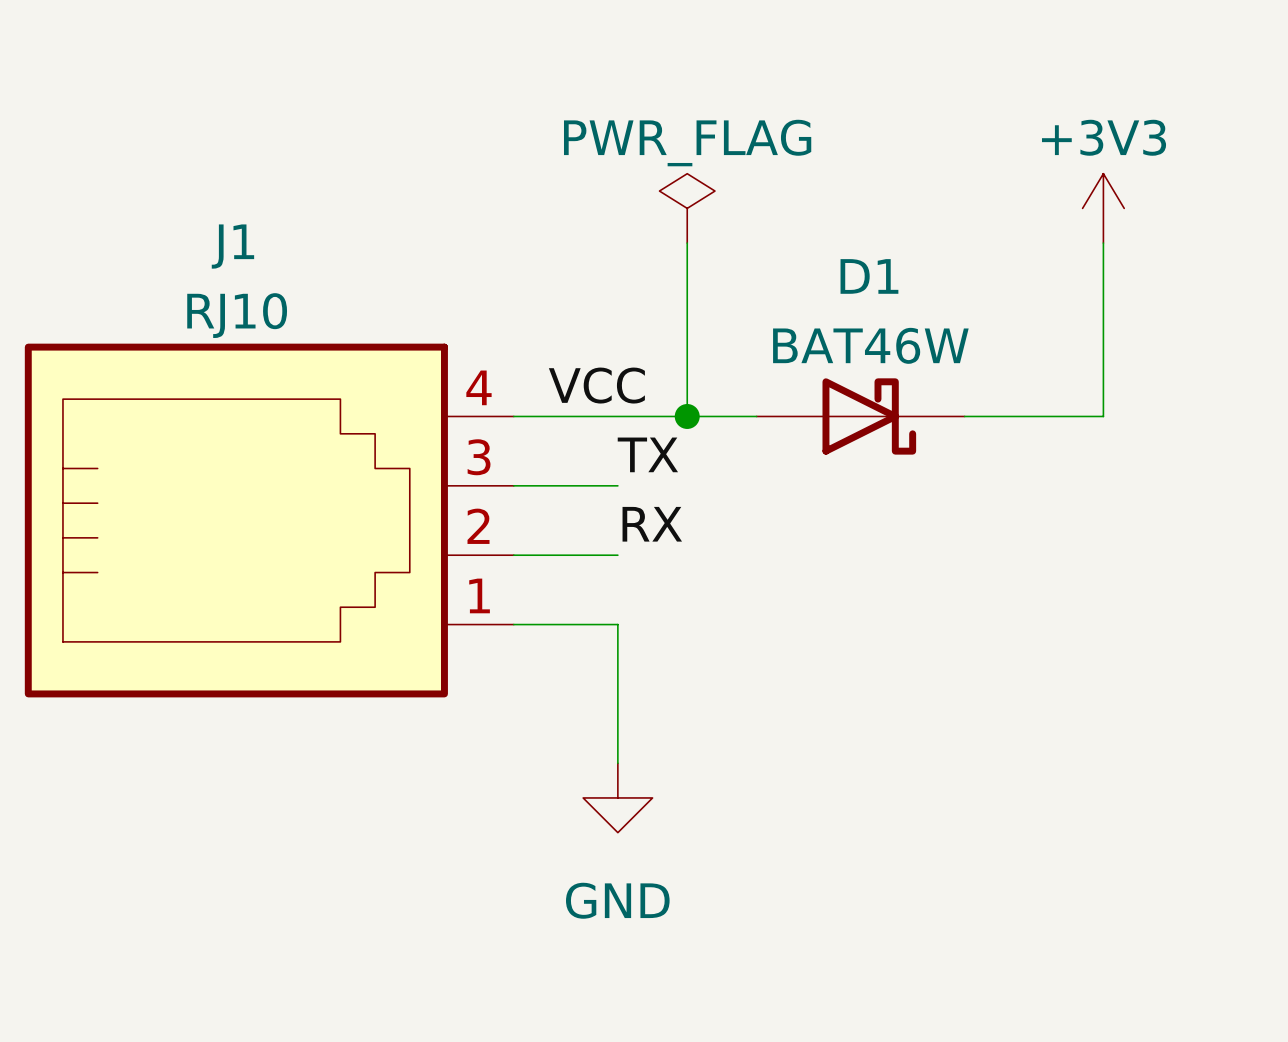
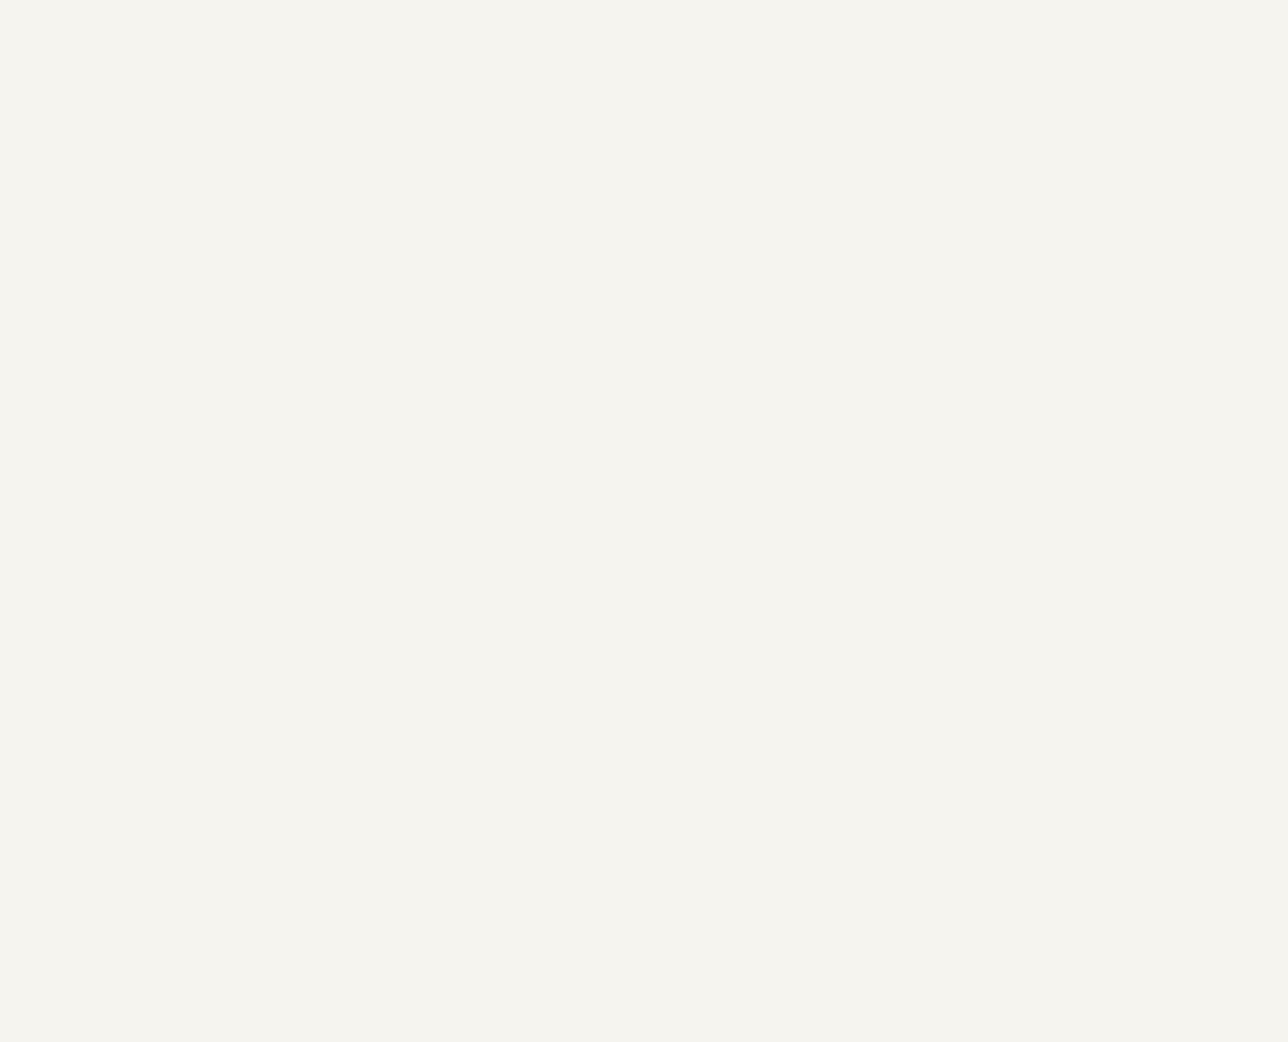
power symbol: PWR_FLAG (687, 208) -> none
power symbol: +3V3 (1103, 208) -> none
wire: (687, 243) (687, 416) -> none
wire: (1103, 243) (1103, 416) (964, 416) -> none
label: VCC (596, 385) -> none
wire: (513, 416) (756, 416) -> none
junction: (687, 416) -> none
D1: BAT46W (860, 416) -> none
label: TX (647, 454) -> none
wire: (513, 485) (617, 485) -> none
J1: RJ10 (269, 520) -> none
label: RX (652, 524) -> none
wire: (513, 555) (617, 555) -> none
wire: (513, 624) (617, 624) (617, 763) -> none
power symbol: GND (617, 797) -> none

